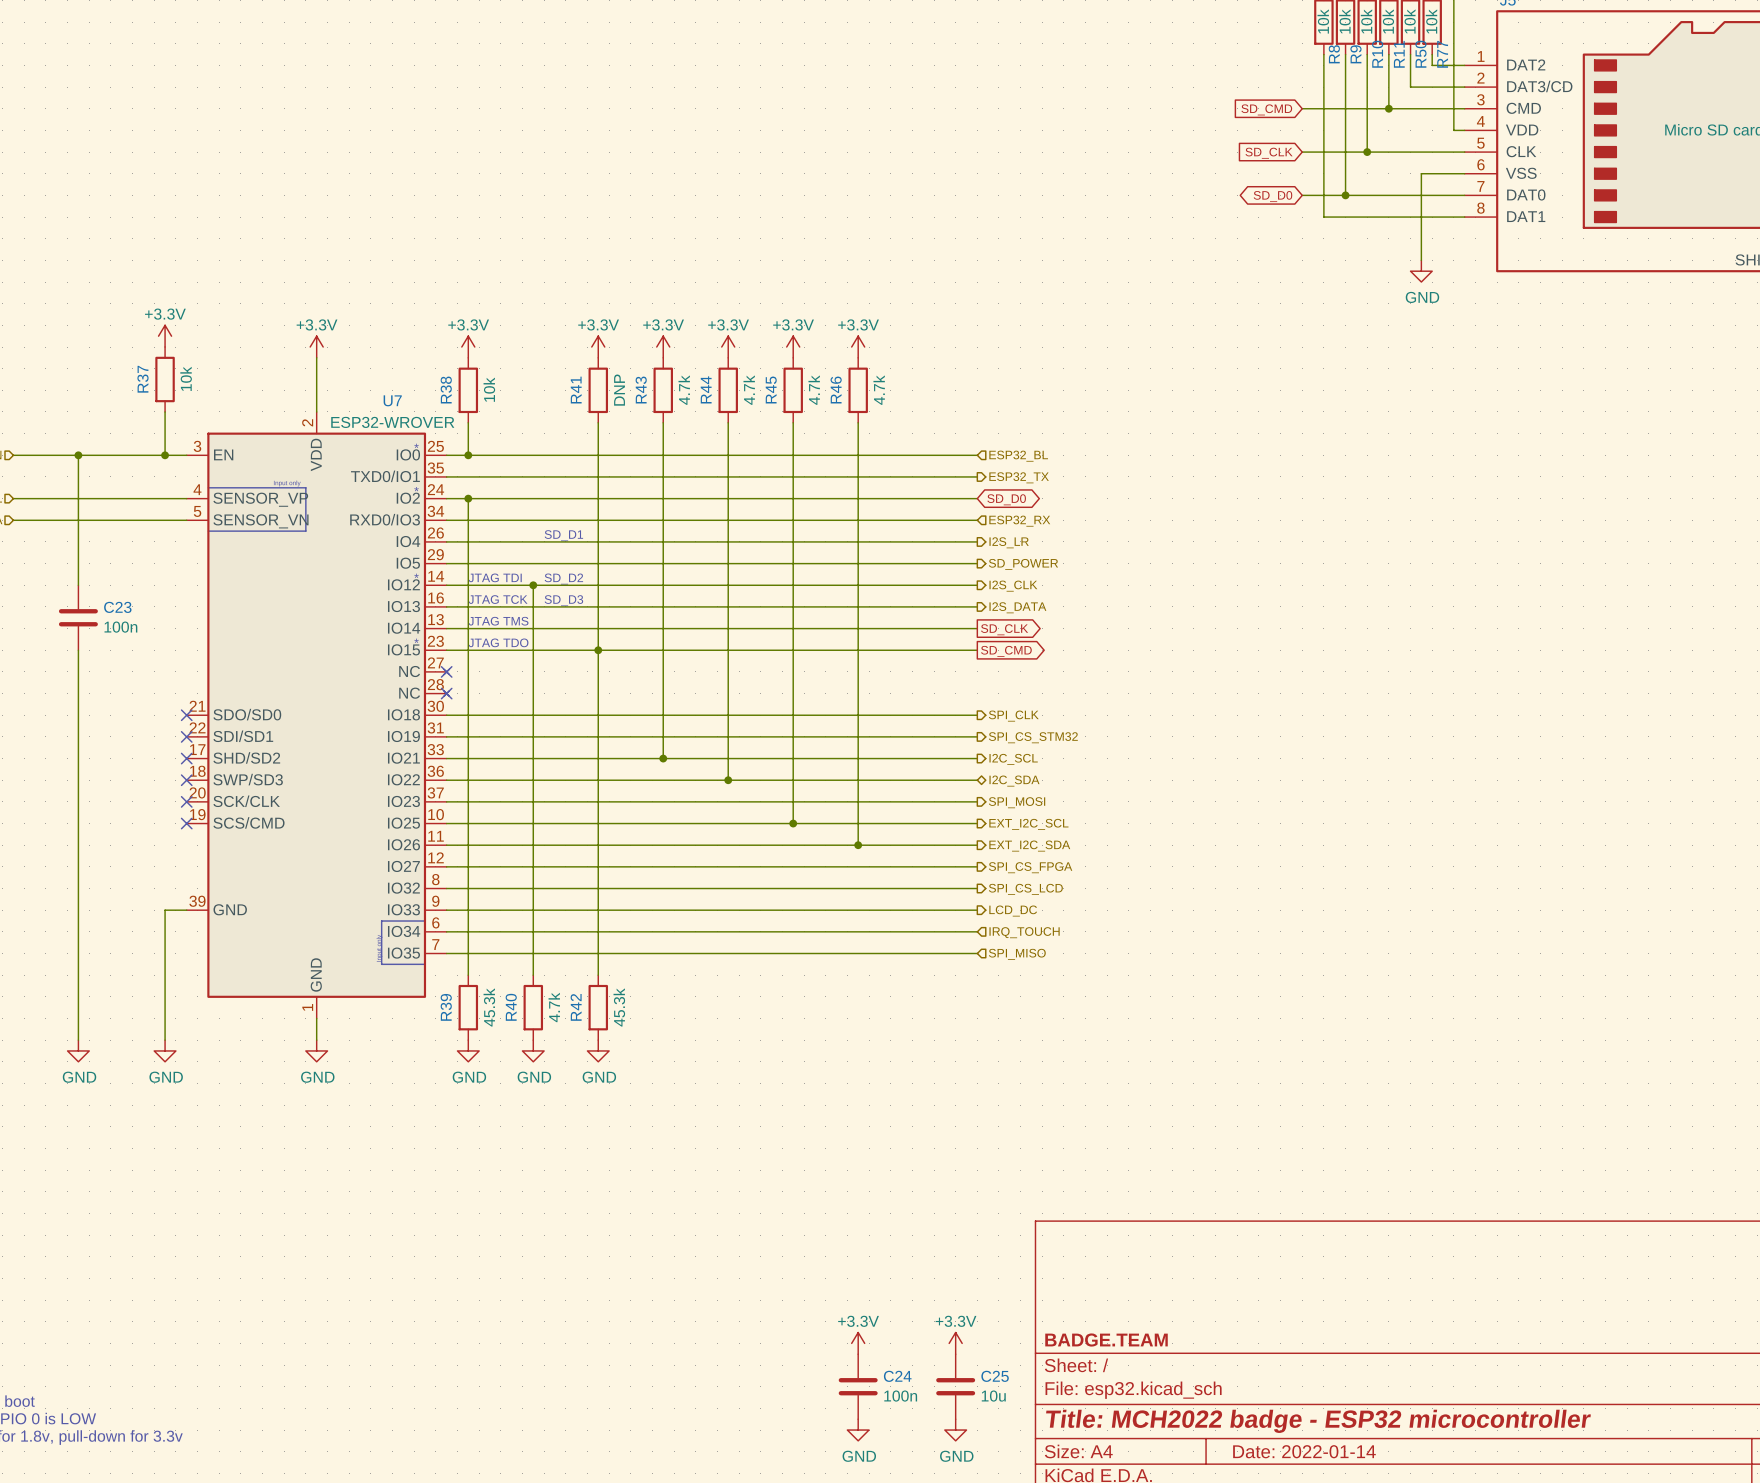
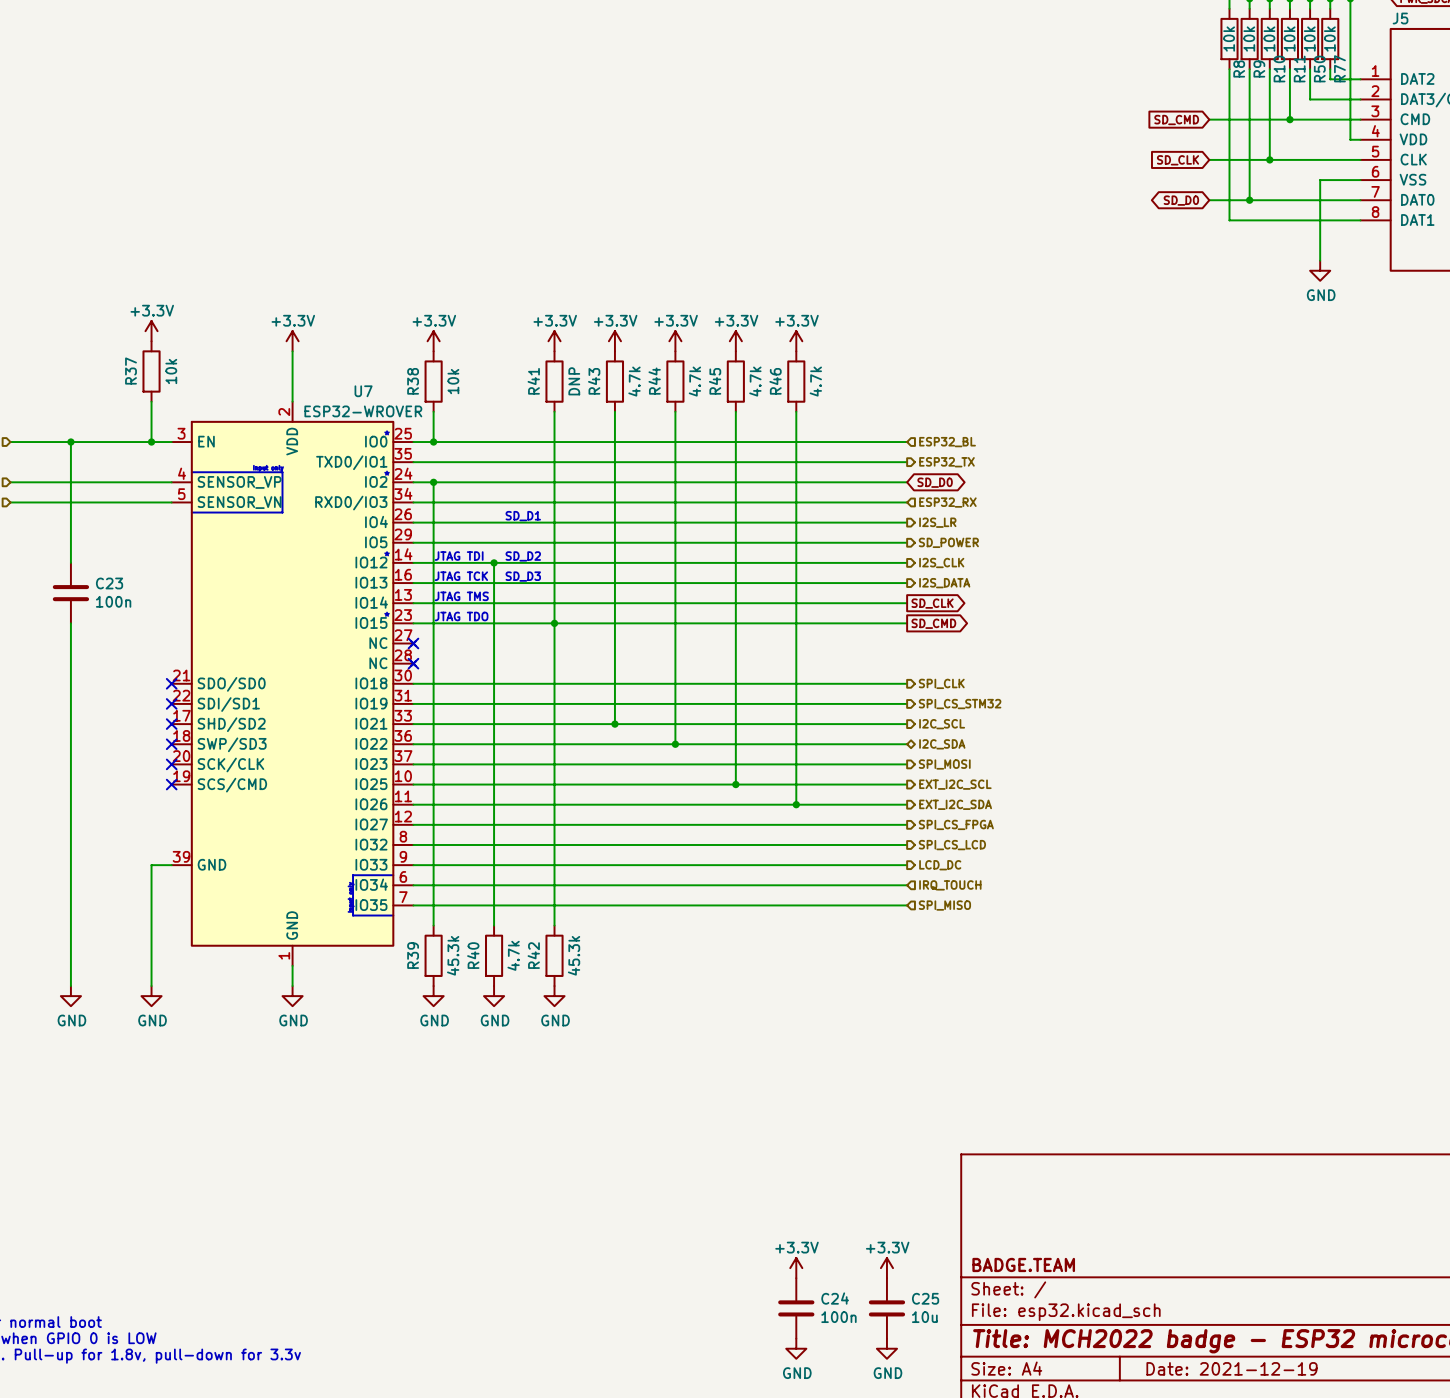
title block: Date: 2022-01-14 (1304, 1451) -> Date: 2021-12-19 (1232, 1368)

